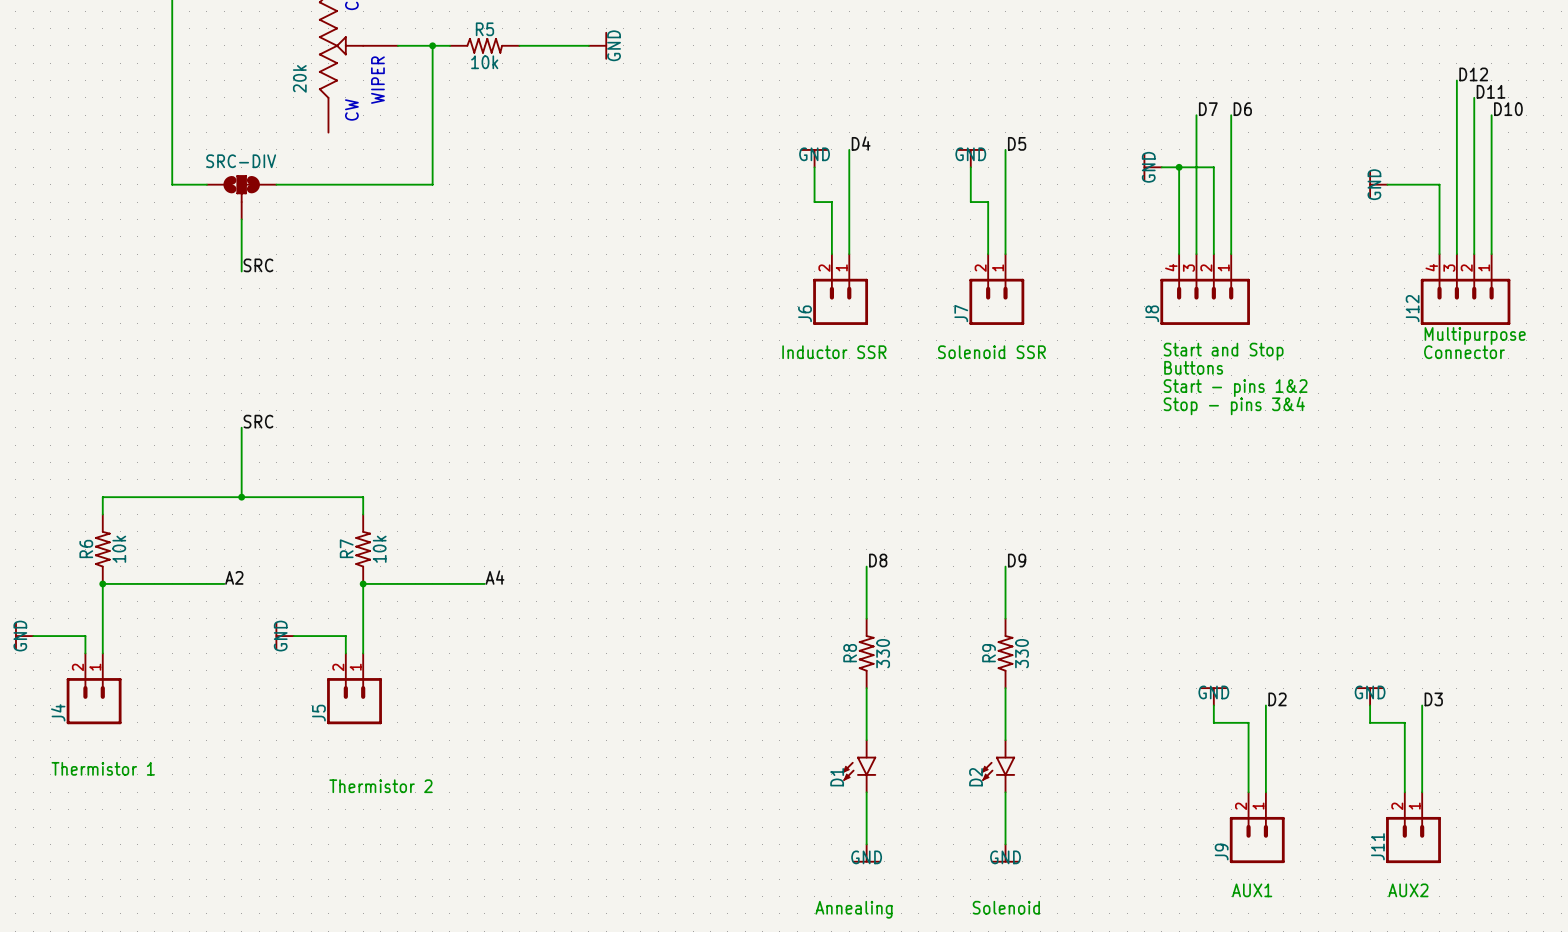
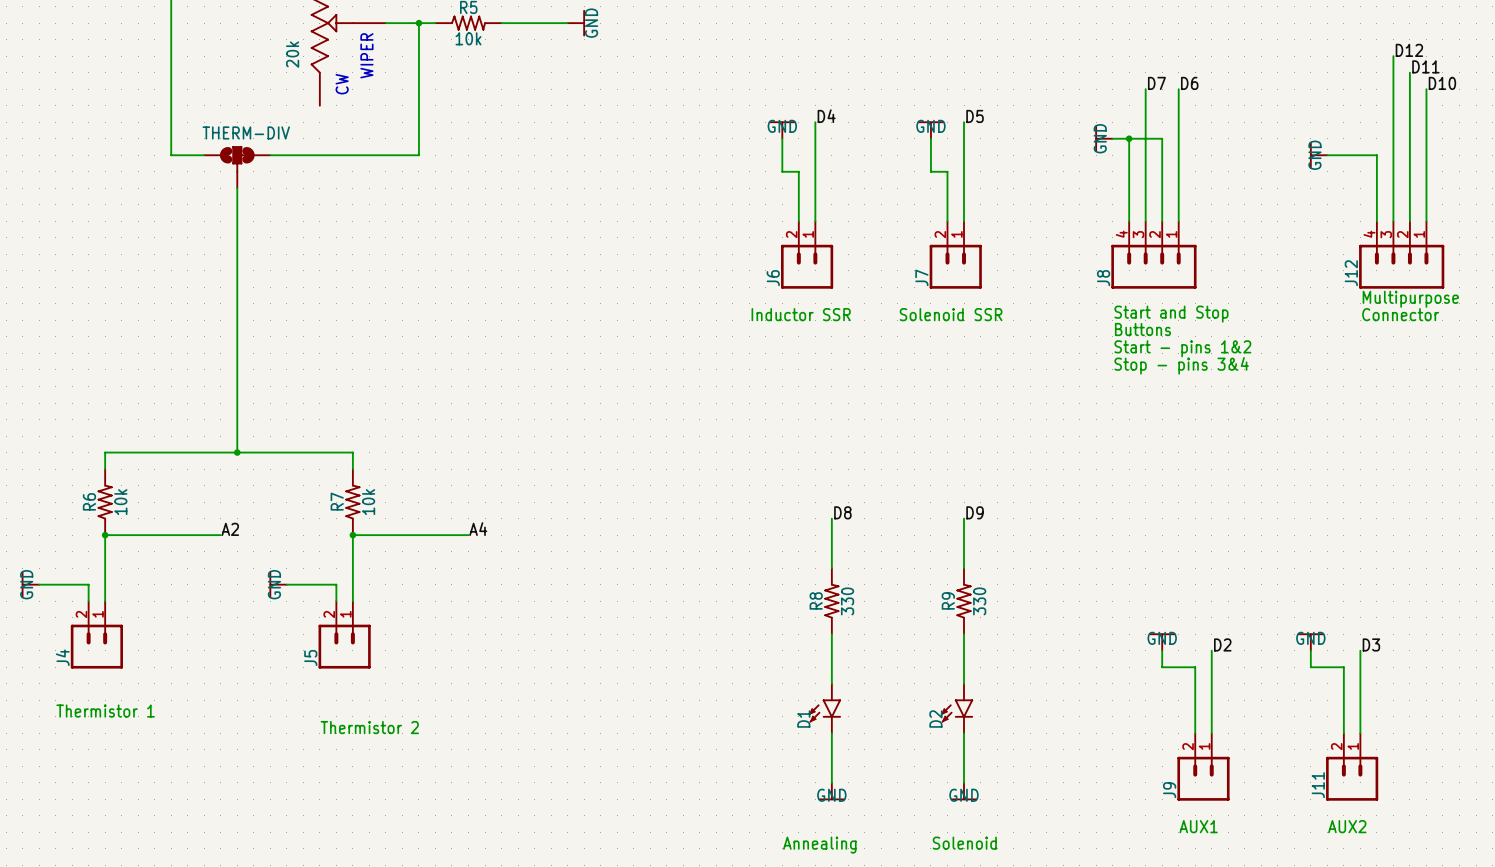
SRC-DIV name: SRC-DIV (241, 161) -> THERM-DIV (246, 132)
label: SRC (258, 265) -> none
wire: none -> (237, 237) (237, 386)
label: SRC (258, 421) -> none

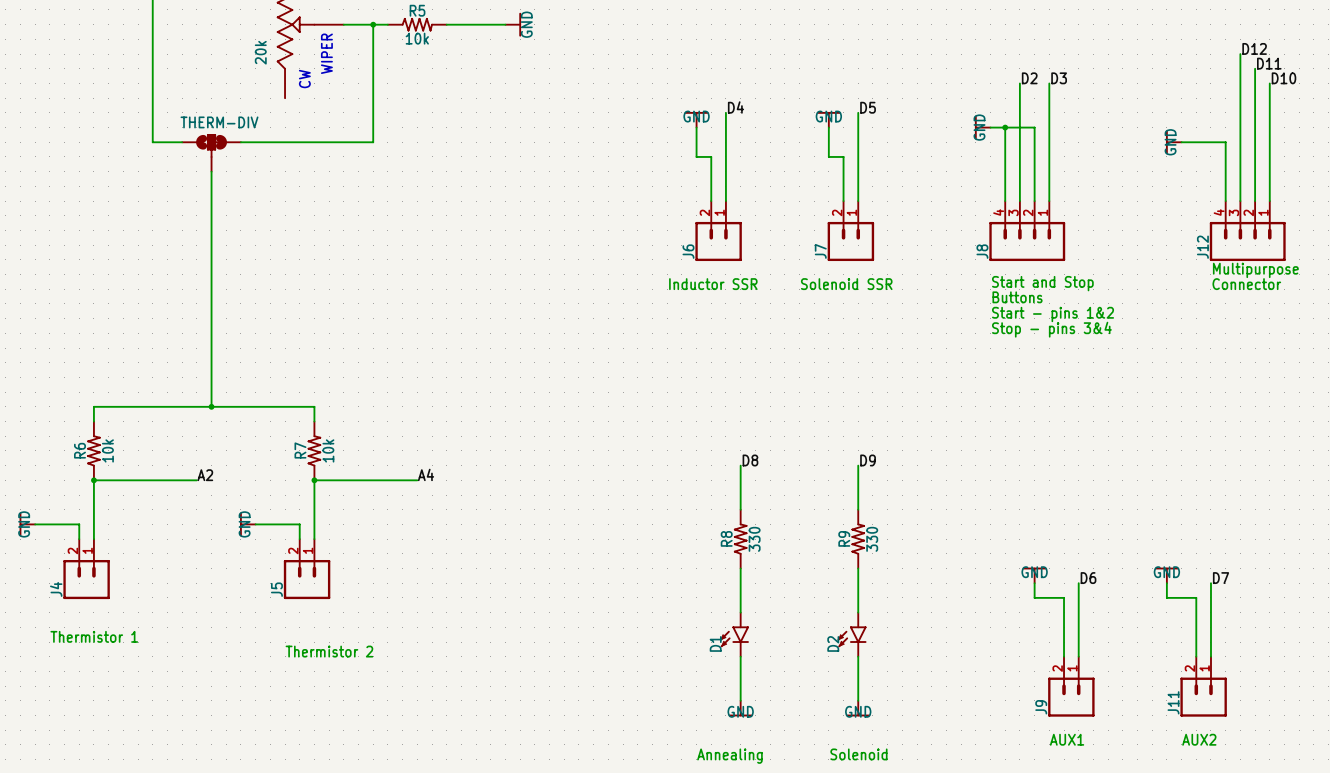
label: D7 (1156, 83) -> D2 (1029, 78)
label: D6 (1189, 83) -> D3 (1059, 78)
label: D2 (1222, 644) -> D6 (1088, 578)
label: D3 (1371, 644) -> D7 (1221, 578)

